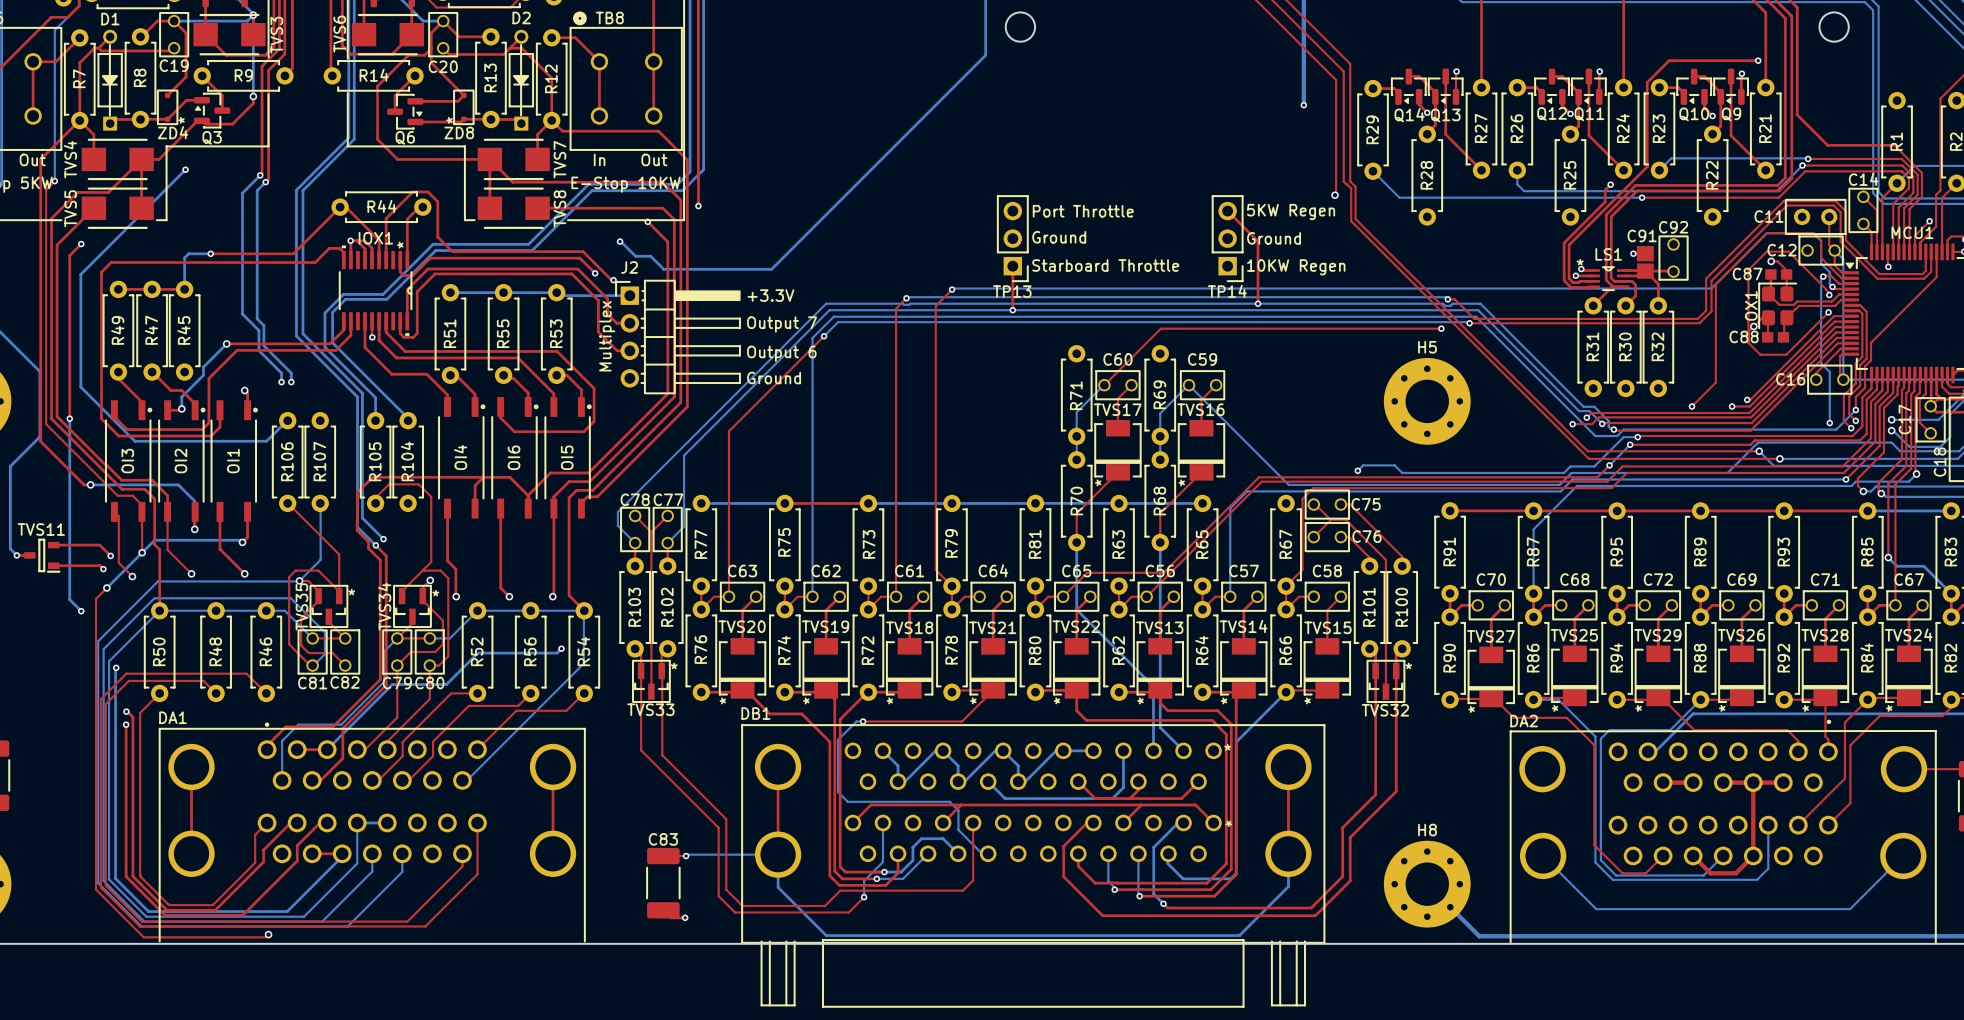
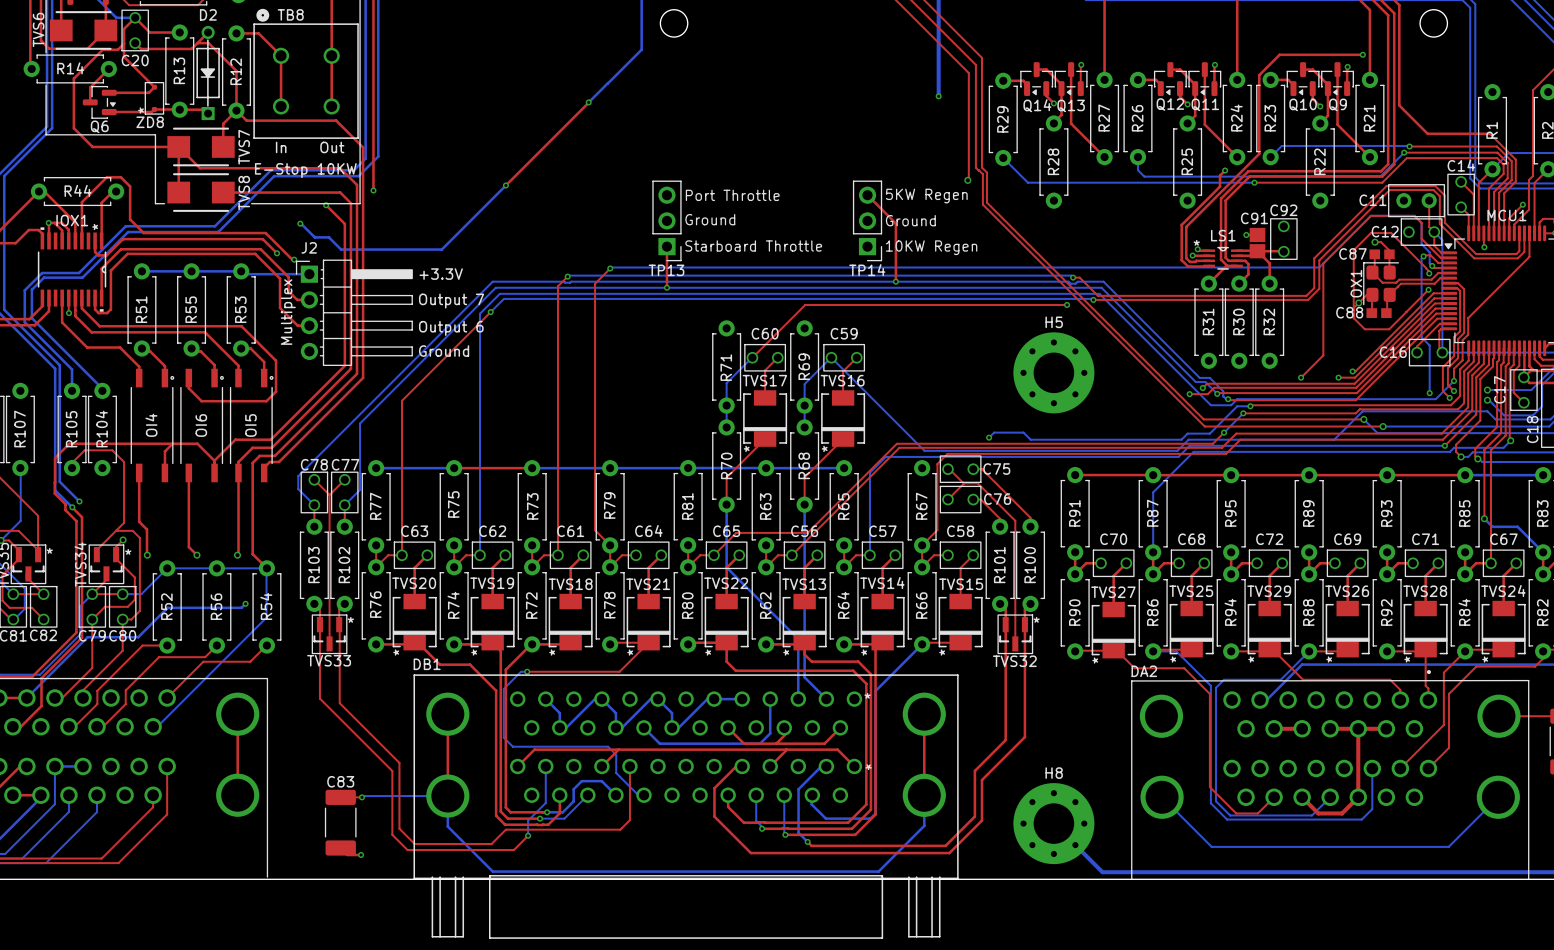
bottom track: (949, 91) (840, 200) -> (607, 83) (588, 102)
top track: none -> (588, 102) (505, 185)
via: none -> (588, 102)
via: none -> (505, 185)

